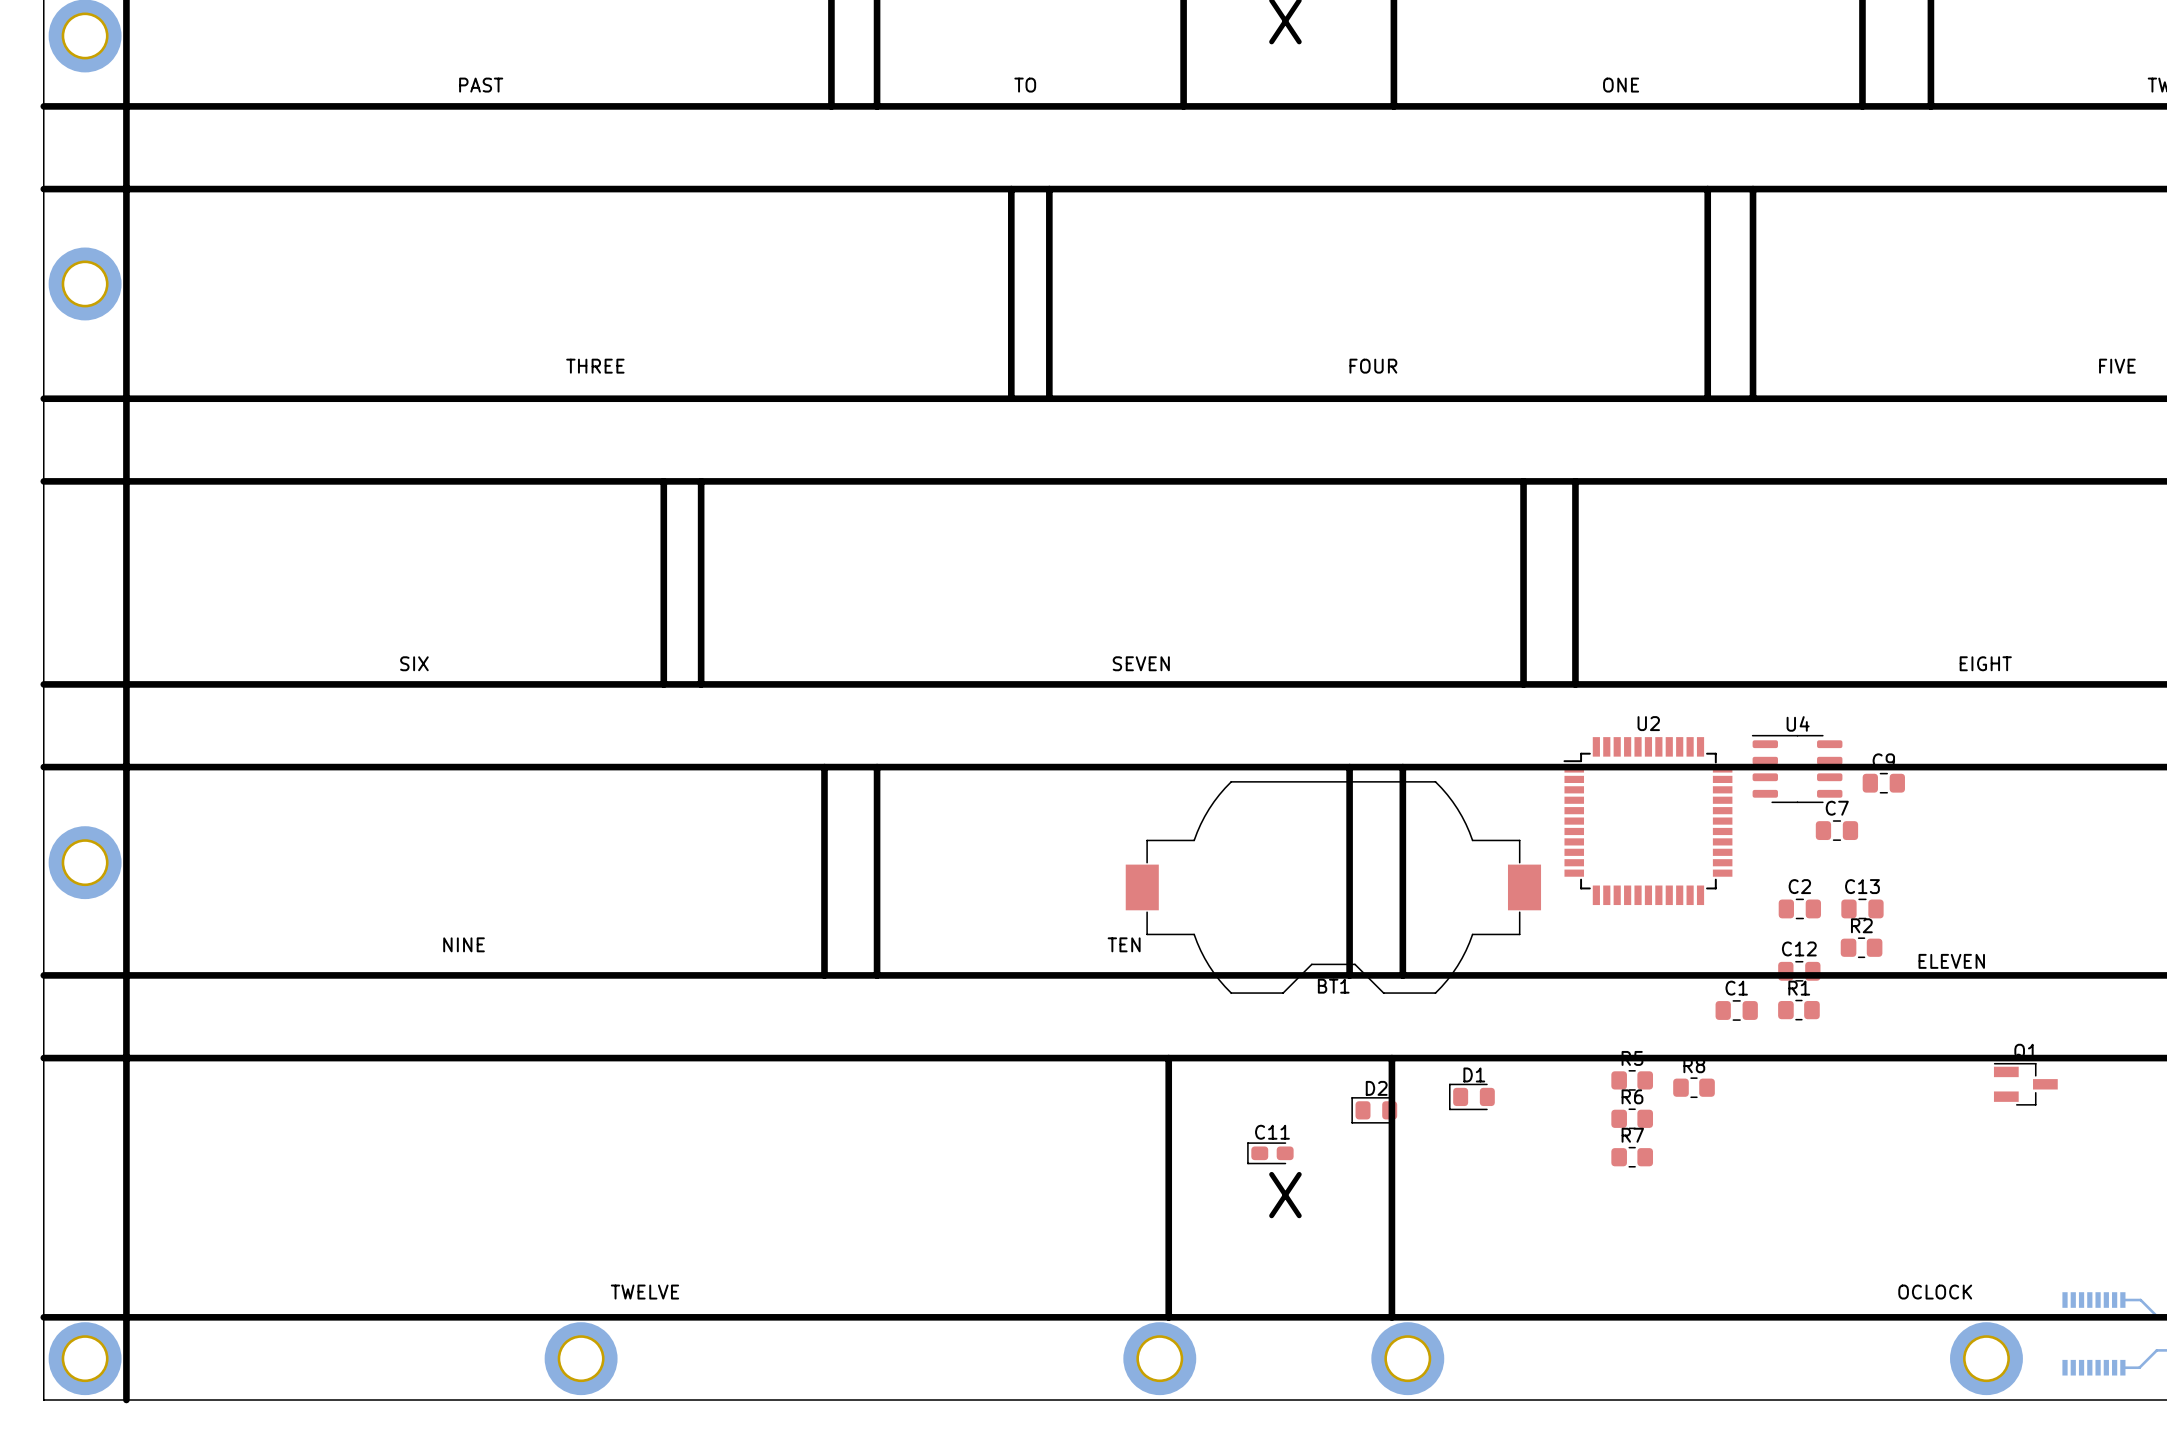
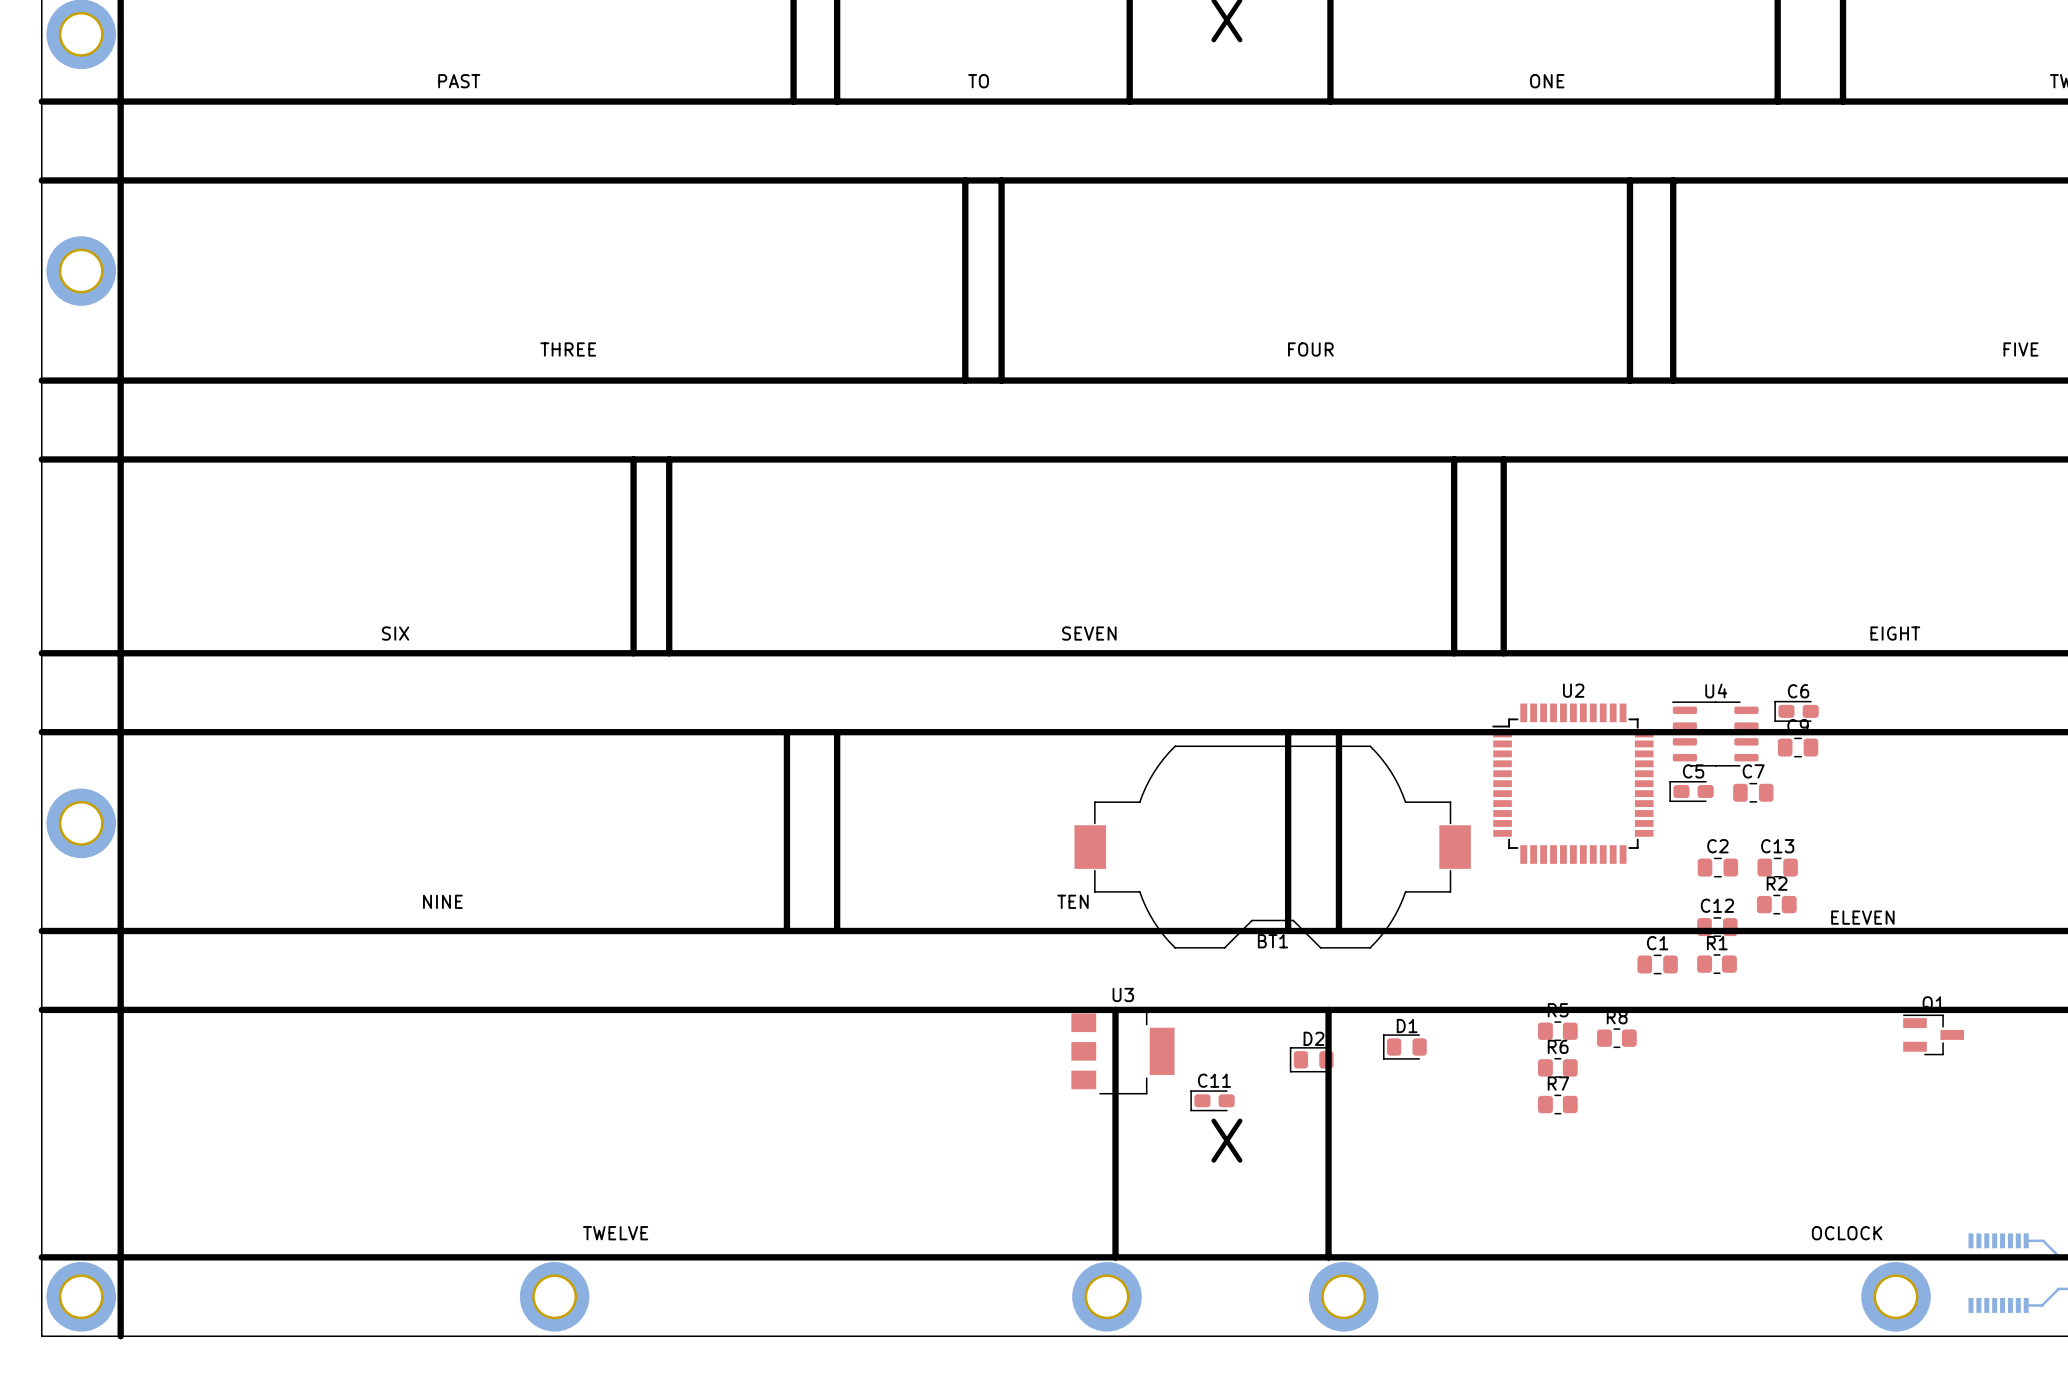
C6: none -> (1796, 711)
C5: none -> (1691, 791)
U3: none -> (1122, 1051)

